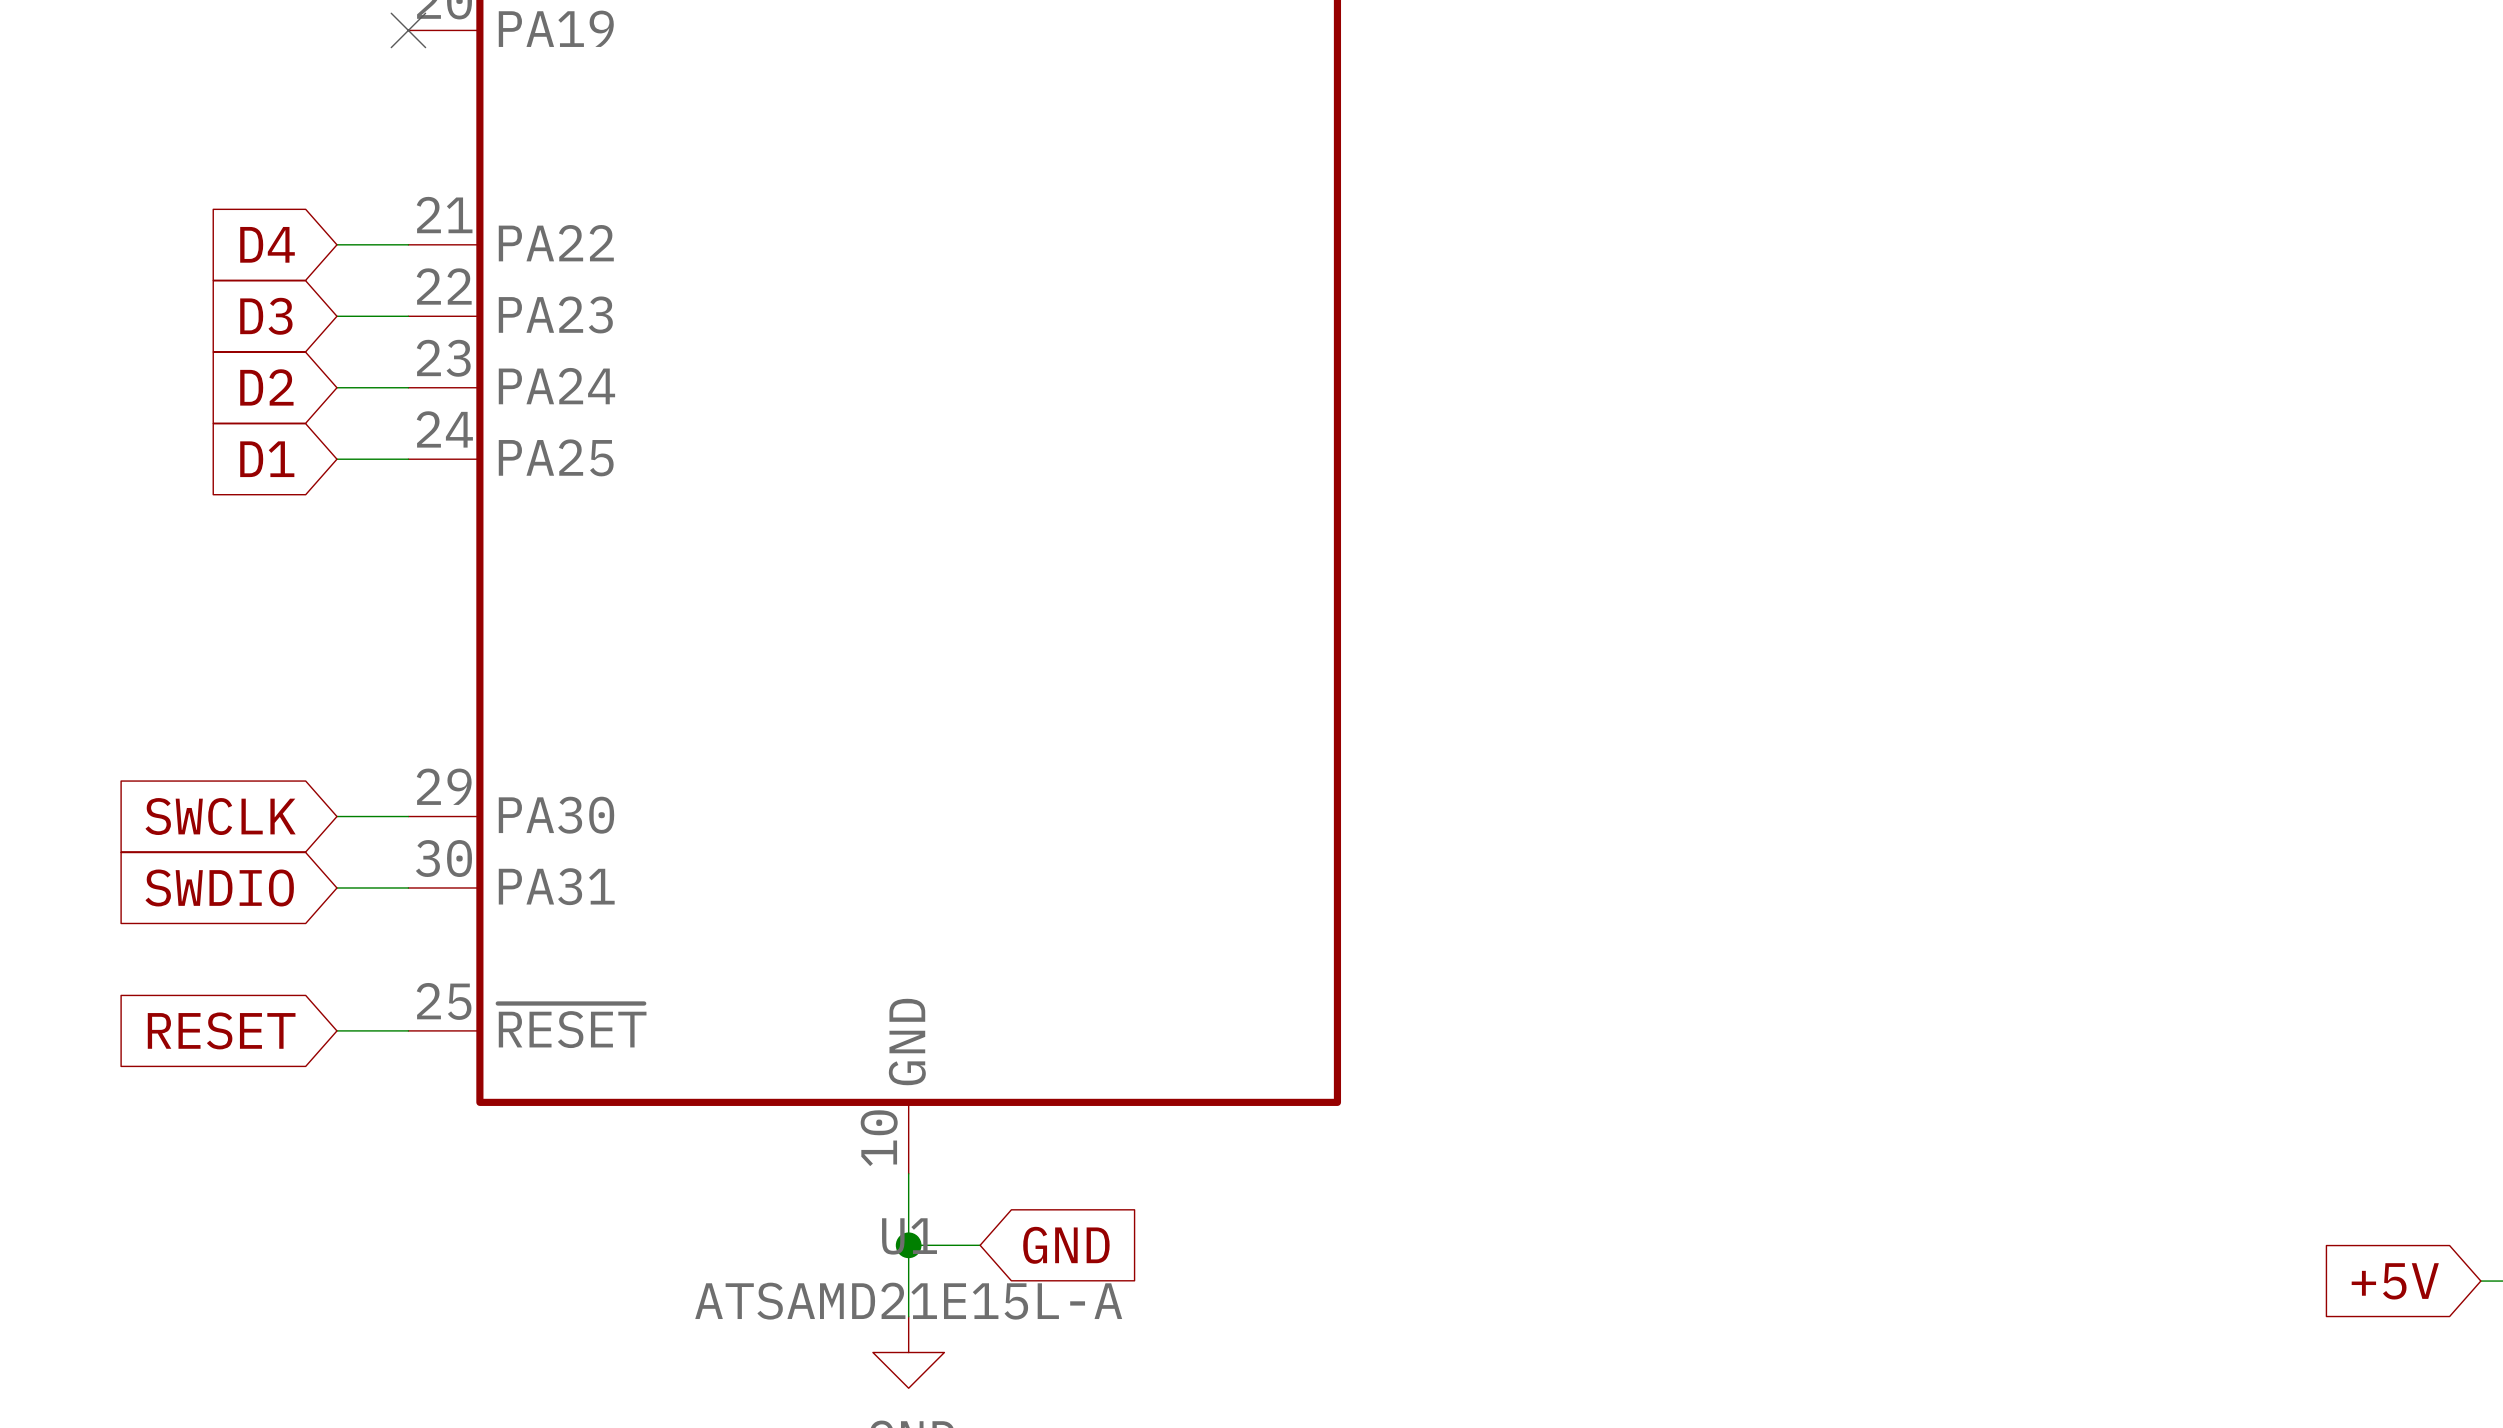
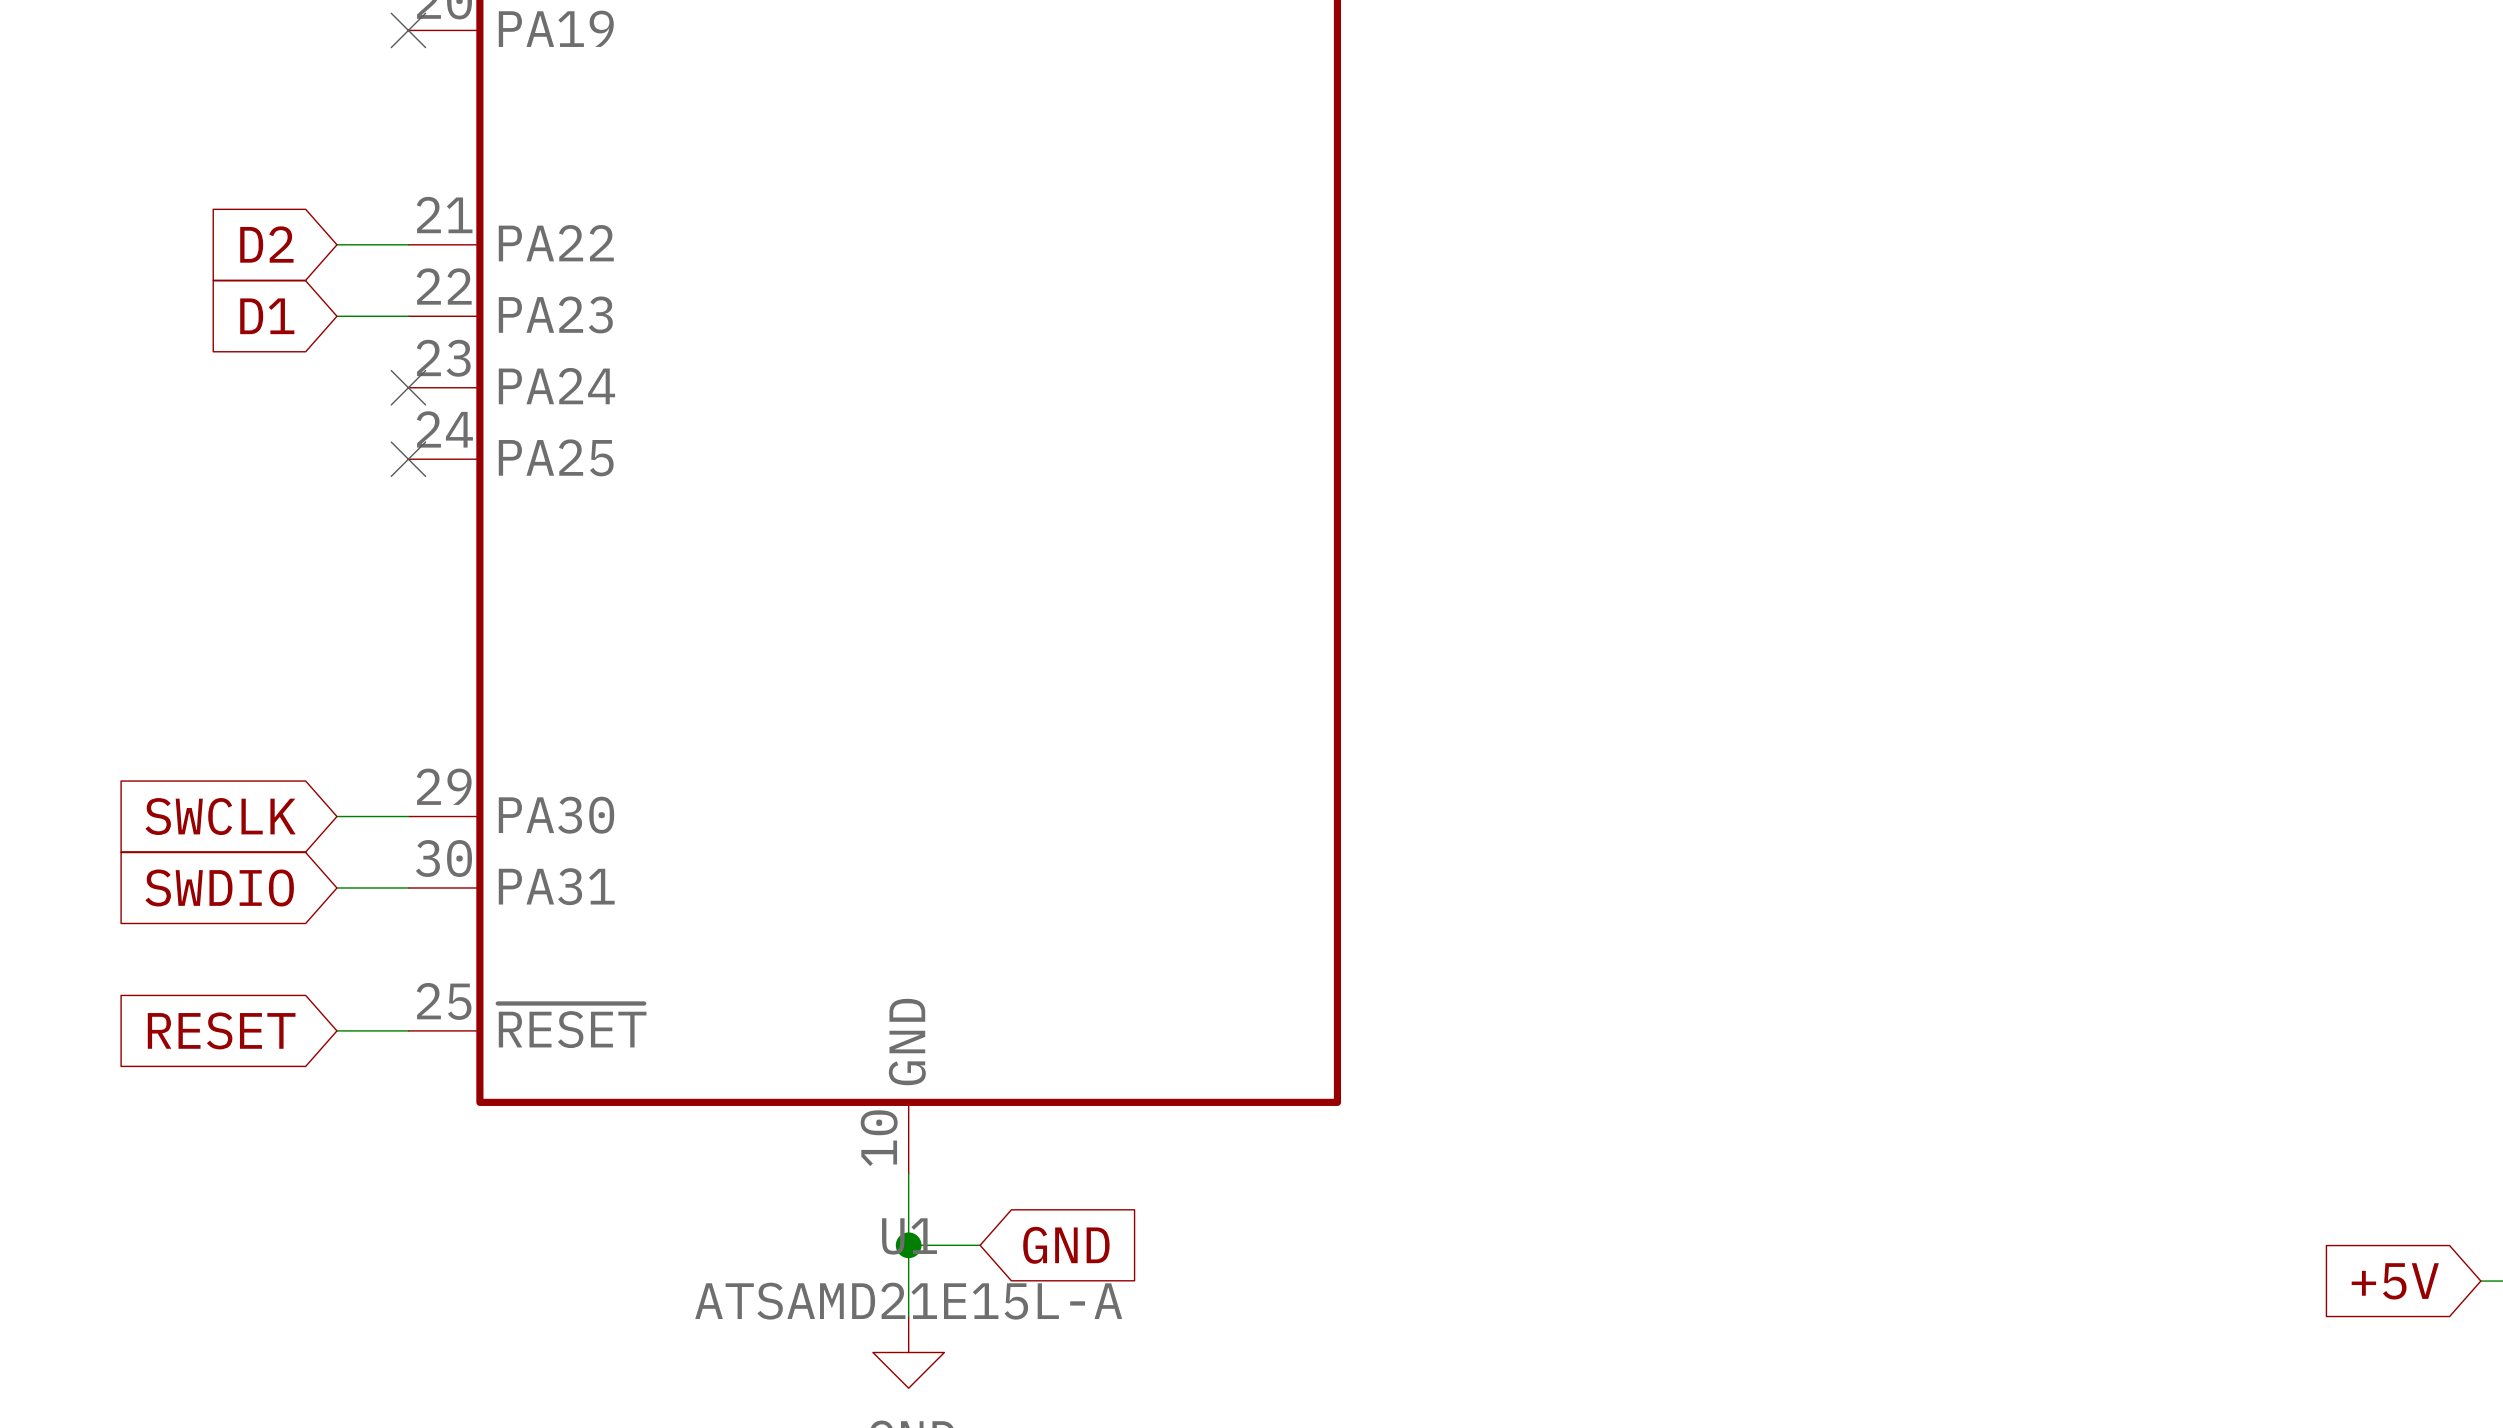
global label: D4 (267, 244) -> D2 (266, 244)
global label: D3 (266, 316) -> D1 (267, 316)
global label: D2 (266, 387) -> none
wire: (336, 387) (408, 387) -> none
no-connect mark: none -> (408, 387)
global label: D1 (267, 459) -> none
wire: (336, 459) (408, 459) -> none
no-connect mark: none -> (408, 459)

